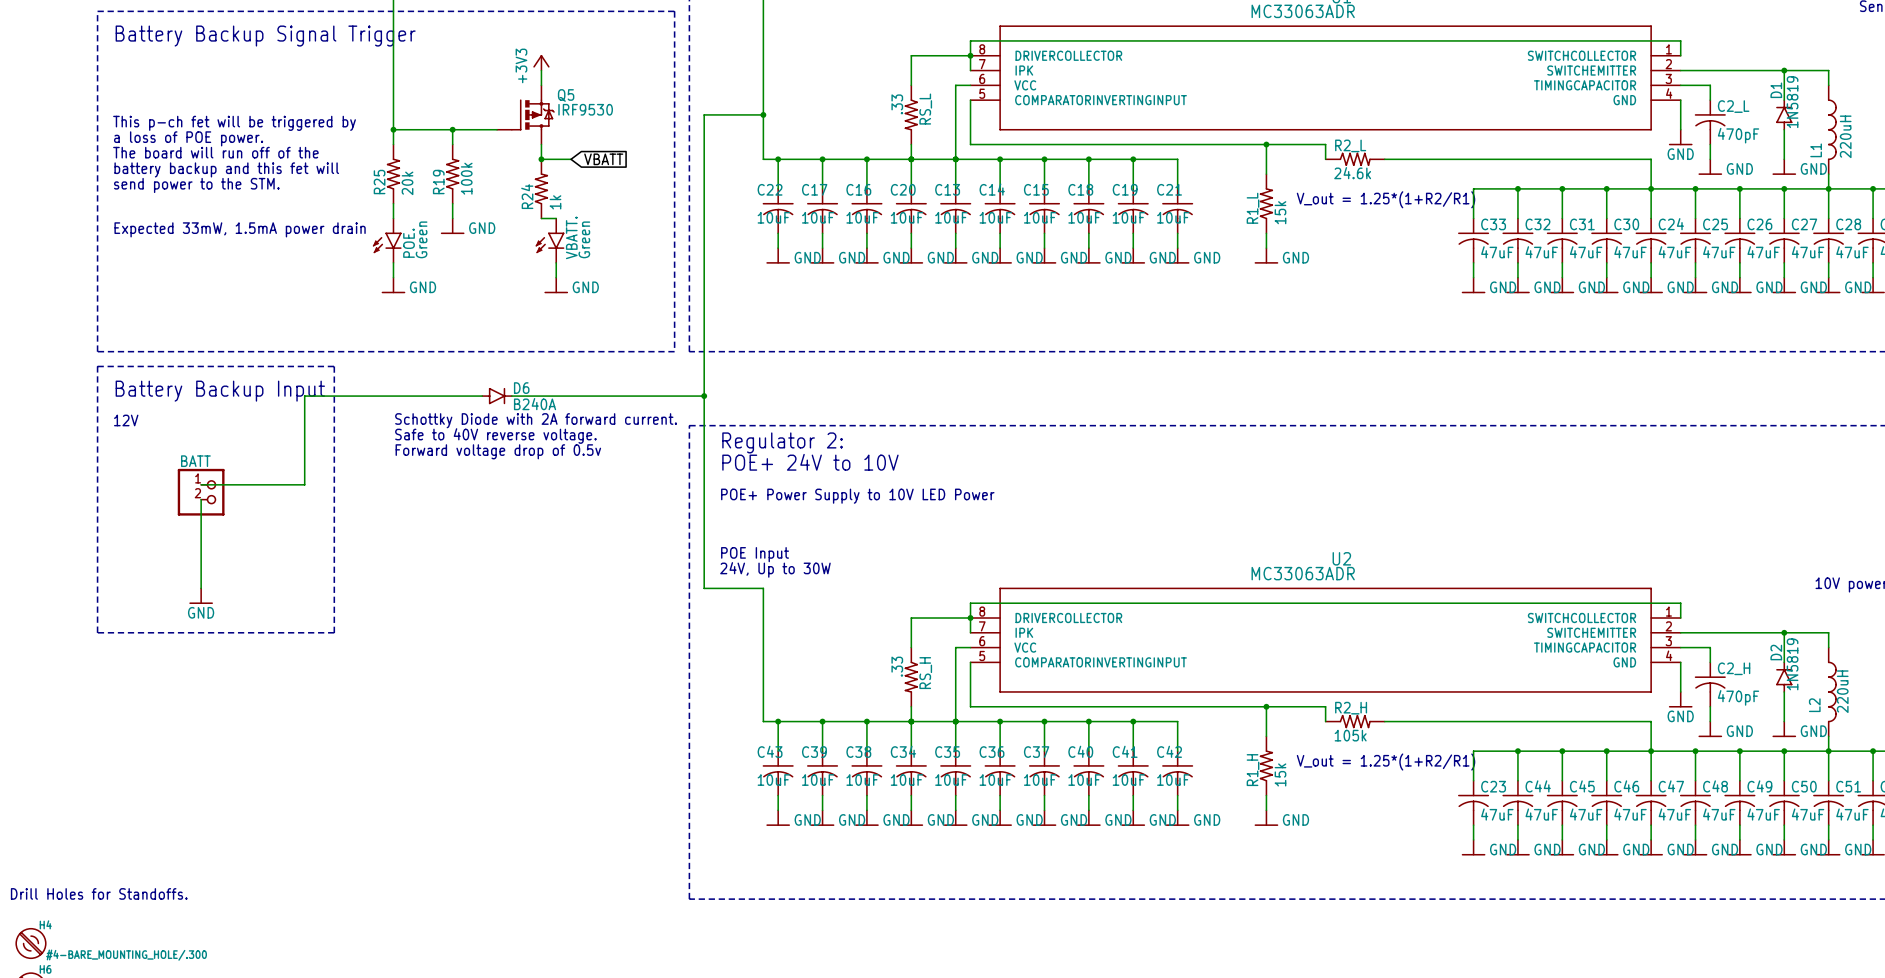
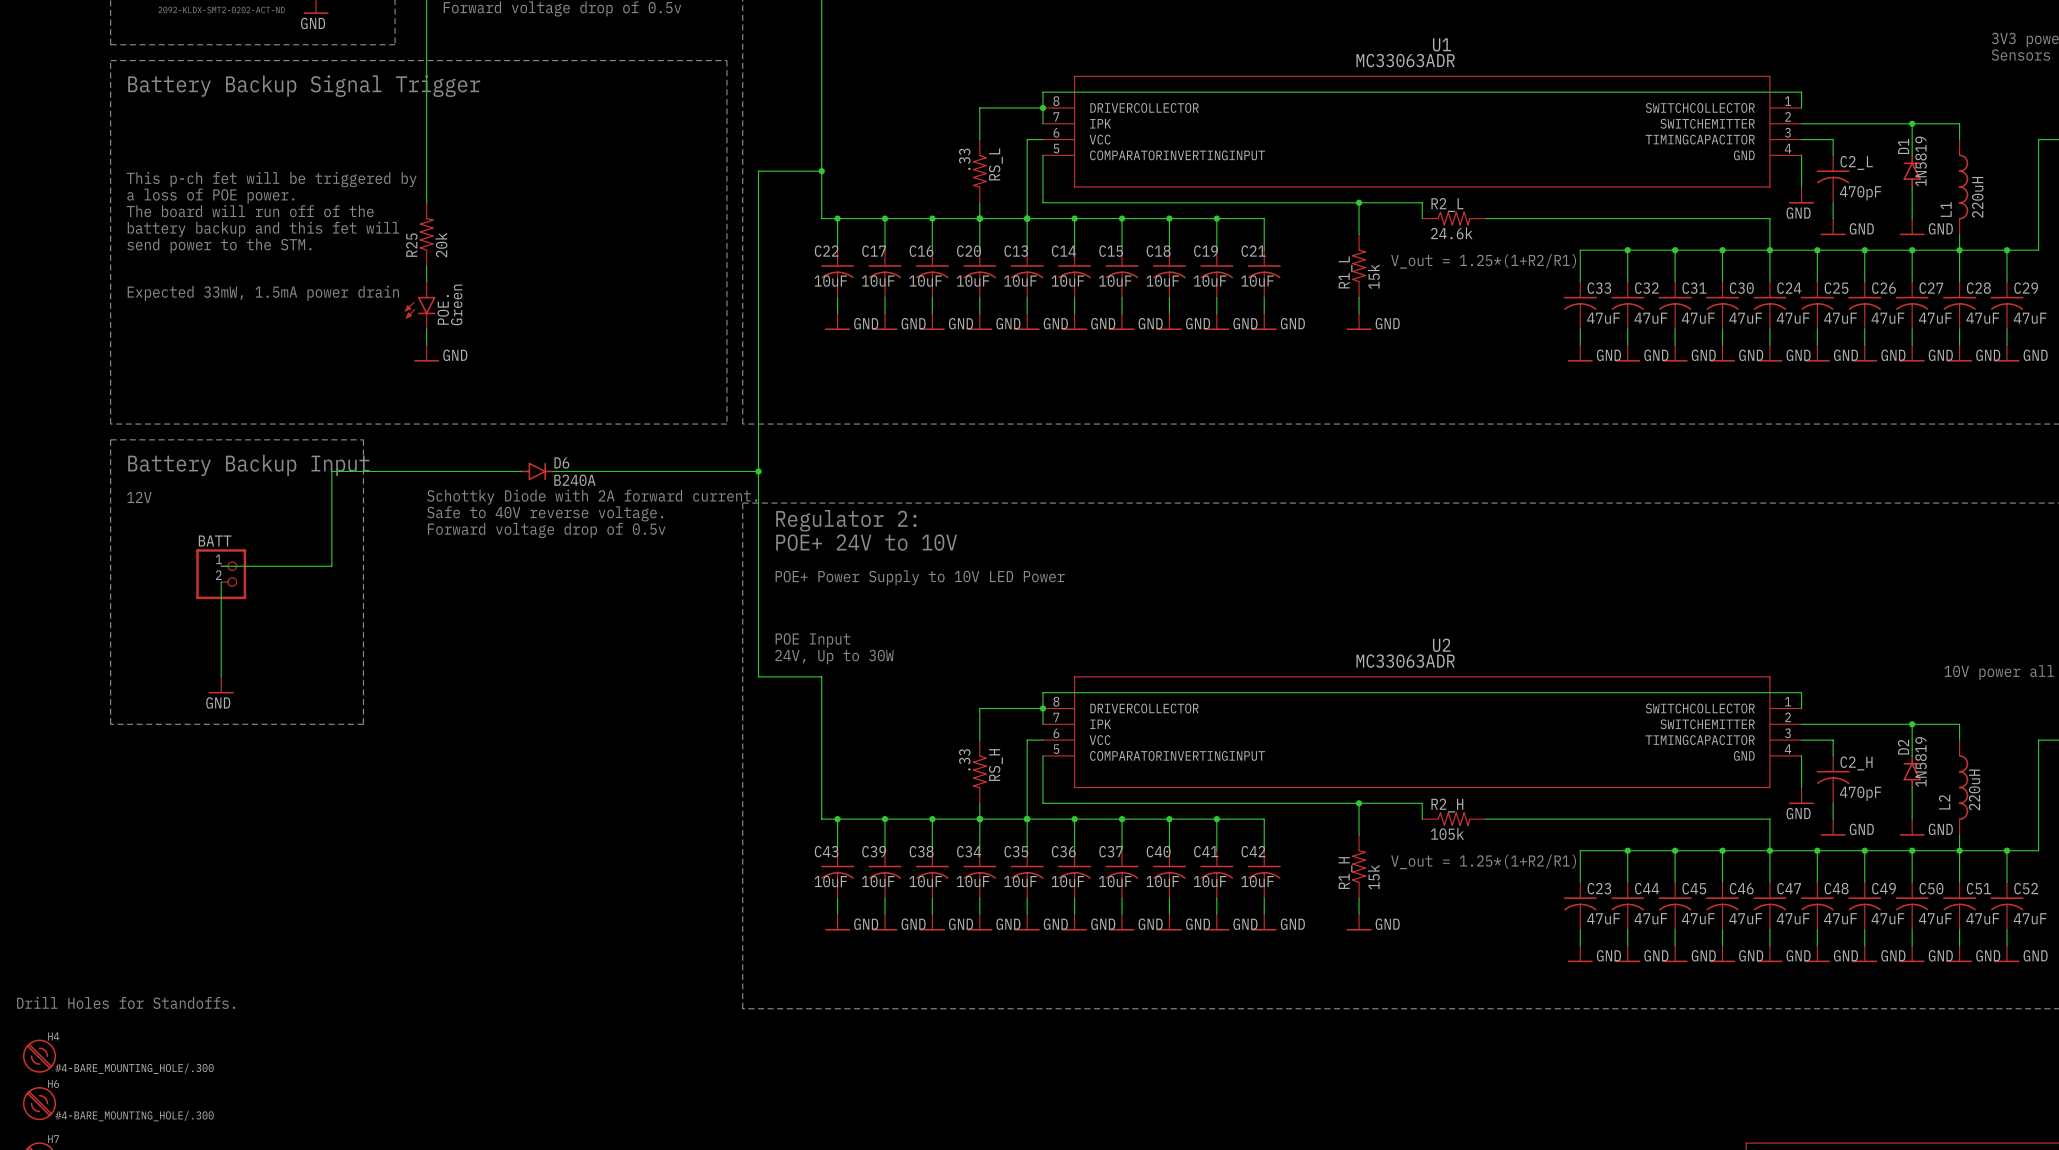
power symbol: +3V3 (541, 62) -> none
wire: (541, 70) (541, 85) -> none
Q5: IRF9530 (525, 114) -> none
wire: (393, 129) (497, 129) -> none
junction: (393, 129) -> none
wire: (452, 129) (452, 144) -> none
junction: (452, 129) -> none
wire: (541, 144) (541, 159) (571, 159) -> none
junction: (541, 159) -> none
global label: VBATT (603, 159) -> none
R19: 100k (452, 174) -> none
R24: 1k (541, 188) -> none
wire: (452, 203) (452, 218) -> none
wire: (541, 218) (556, 218) -> none
power symbol: GND (452, 226) -> none
VBATT.: Green (550, 240) -> none
wire: (556, 262) (556, 277) -> none
power symbol: GND (556, 285) -> none

